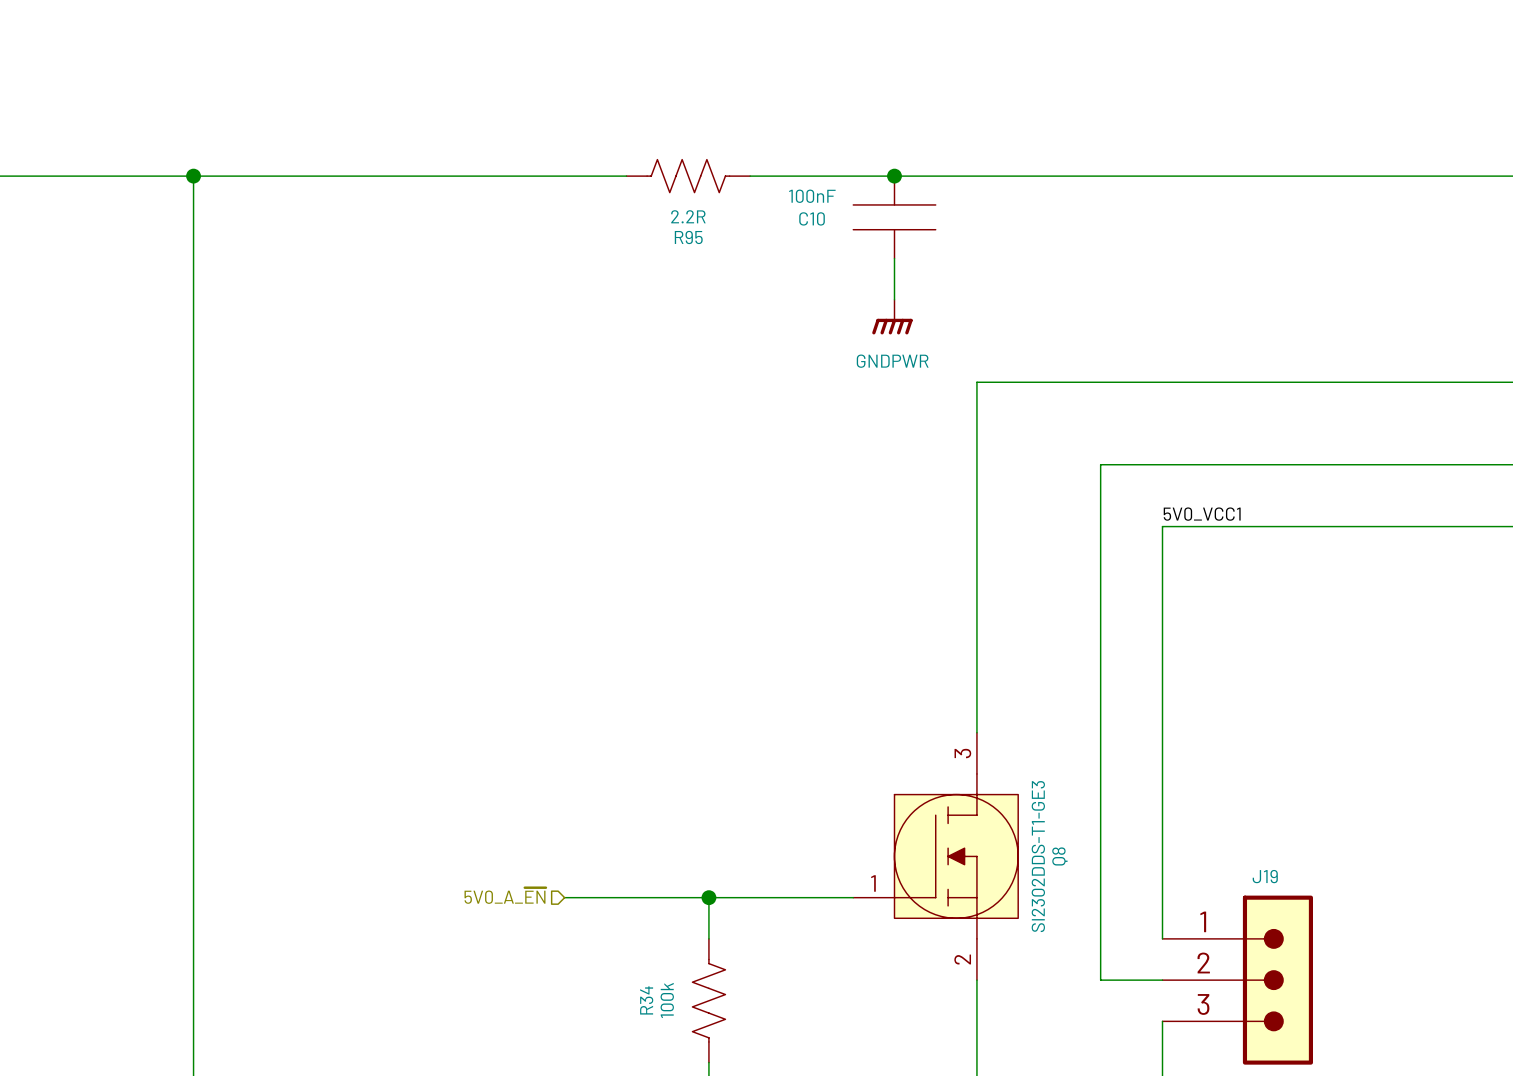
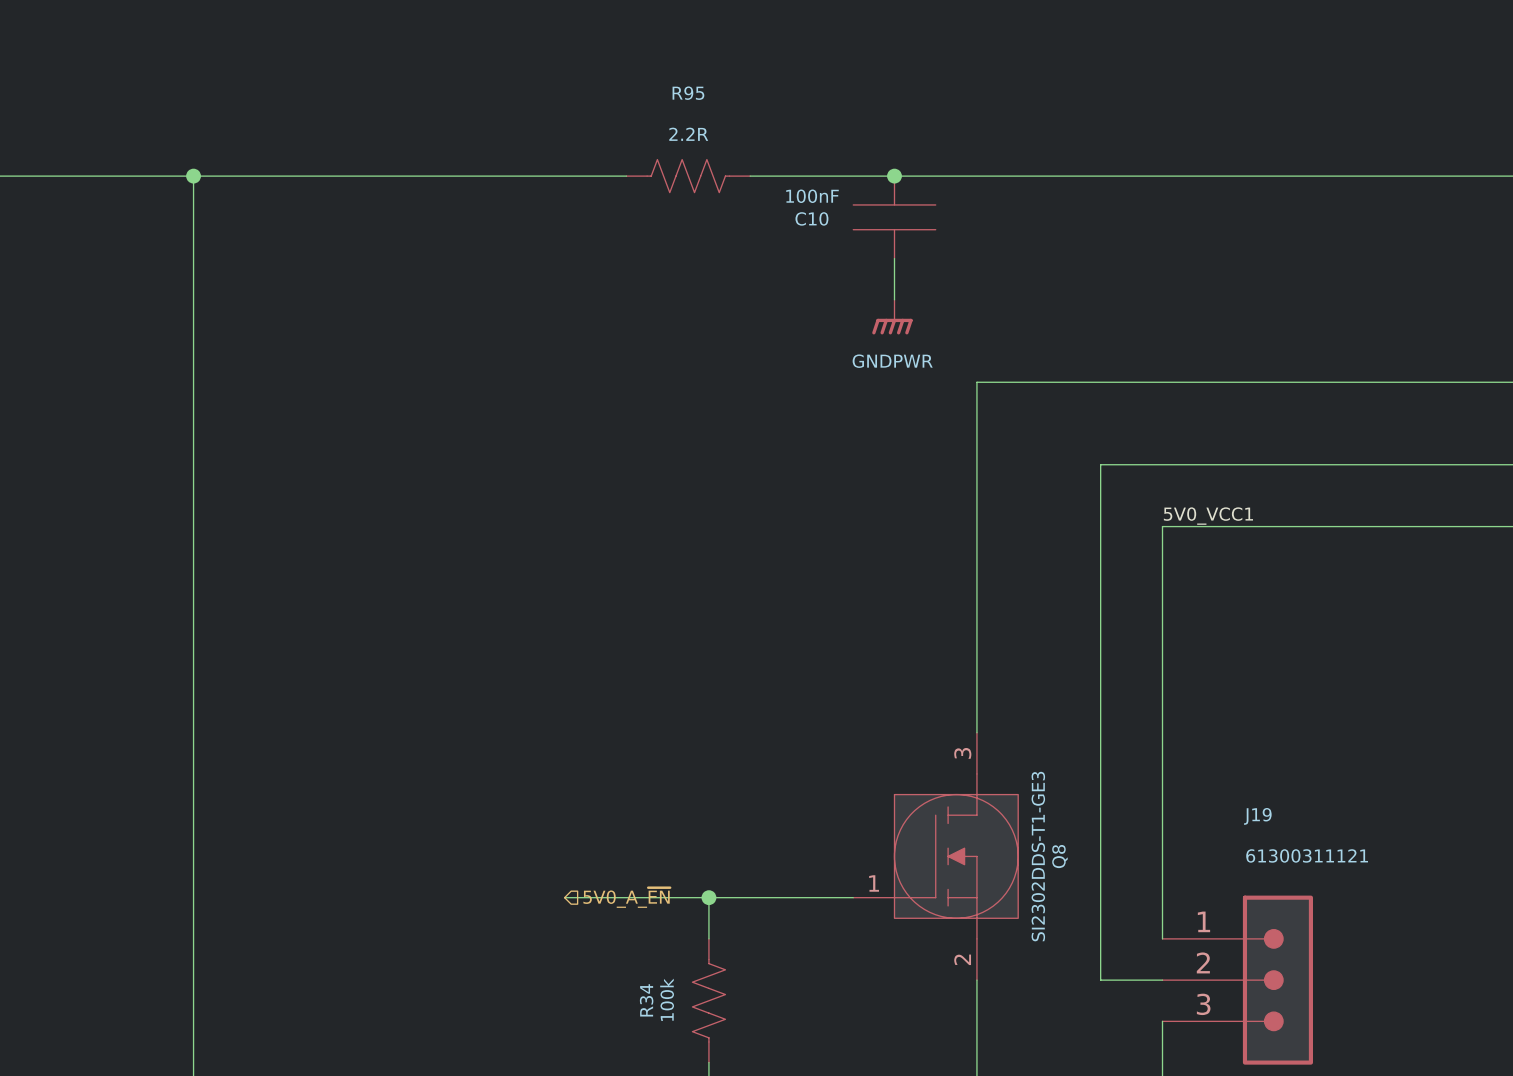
R95 value position: 2.2R (688, 216) -> 2.2R (688, 134)
R95 name position: R95 (688, 237) -> R95 (688, 93)
J19 value: none -> 61300311121 (1307, 855)
J19 name position: J19 (1265, 876) -> J19 (1257, 816)
hierarchical label rotation: 0° (505, 895) -> 180° (626, 897)
hierarchical label position: 5V0_A_~{EN} (505, 895) -> 5V0_A_~{EN} (626, 897)

